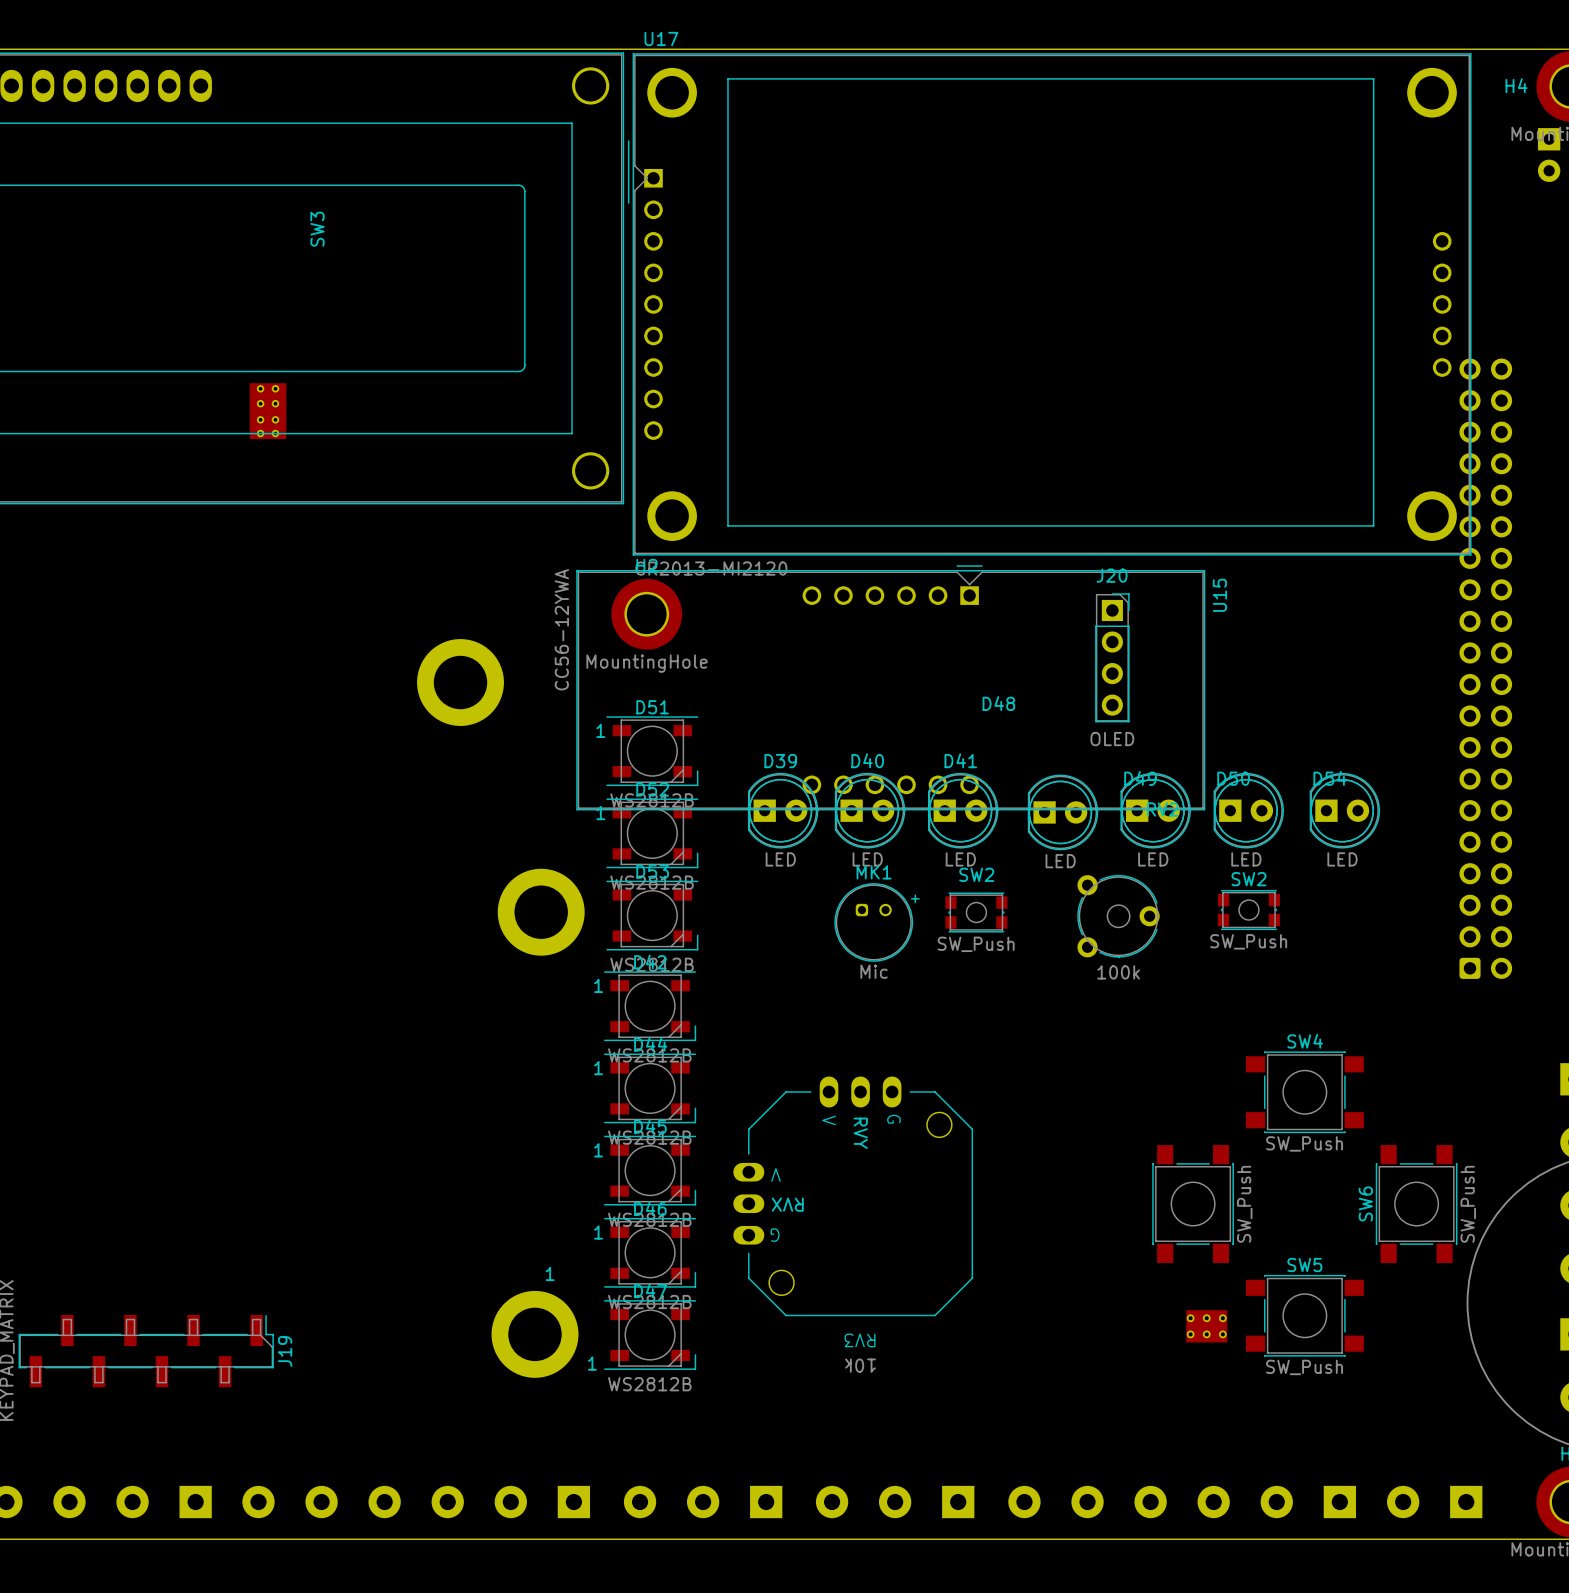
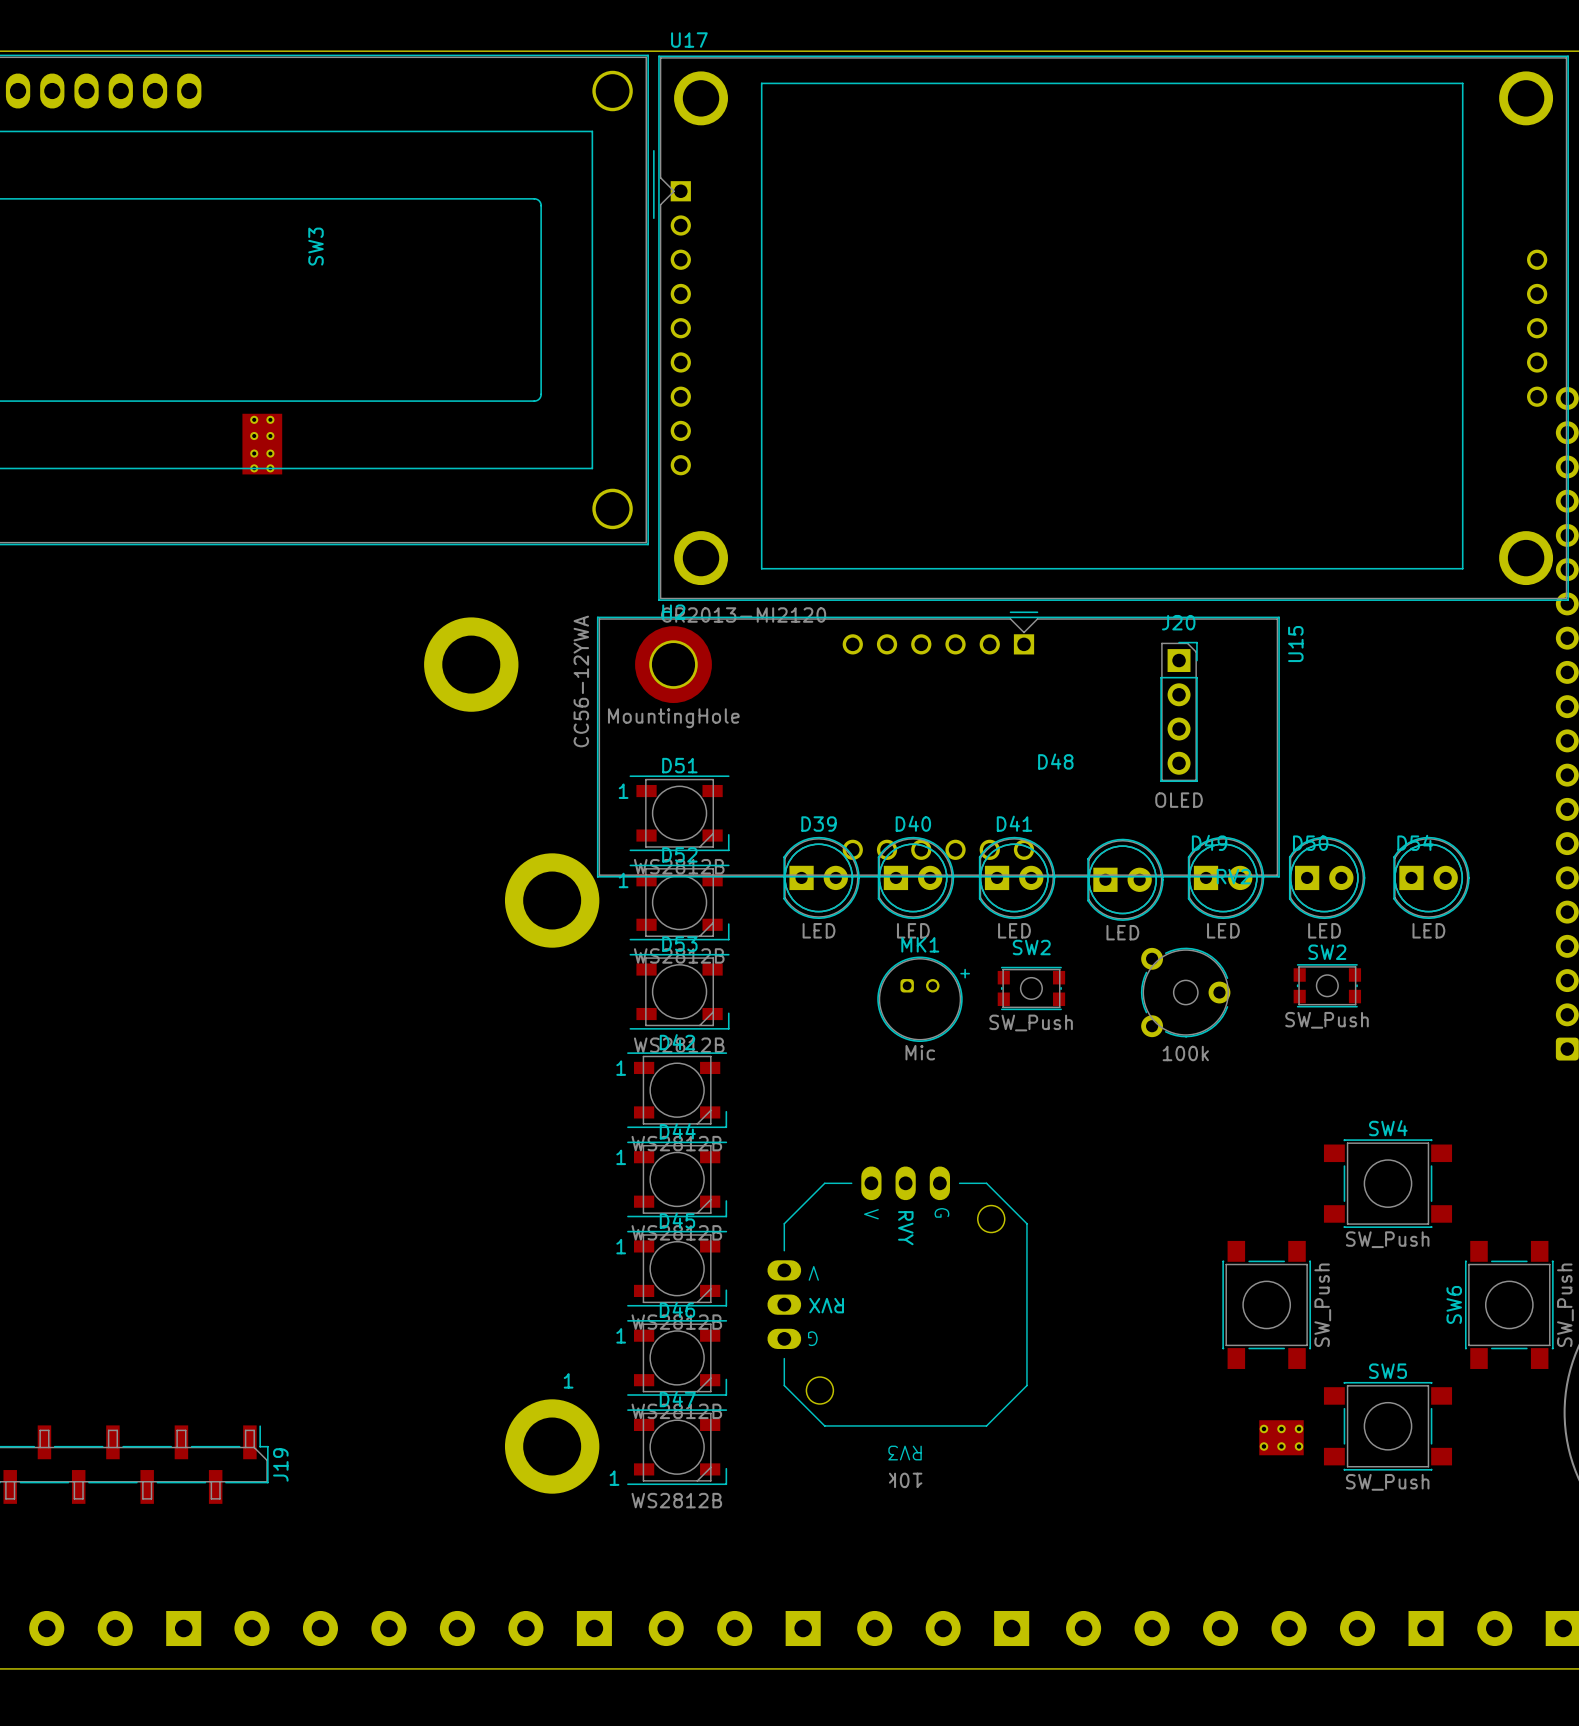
part position: (460, 682) -> (471, 664)
part position: (541, 912) -> (552, 900)

